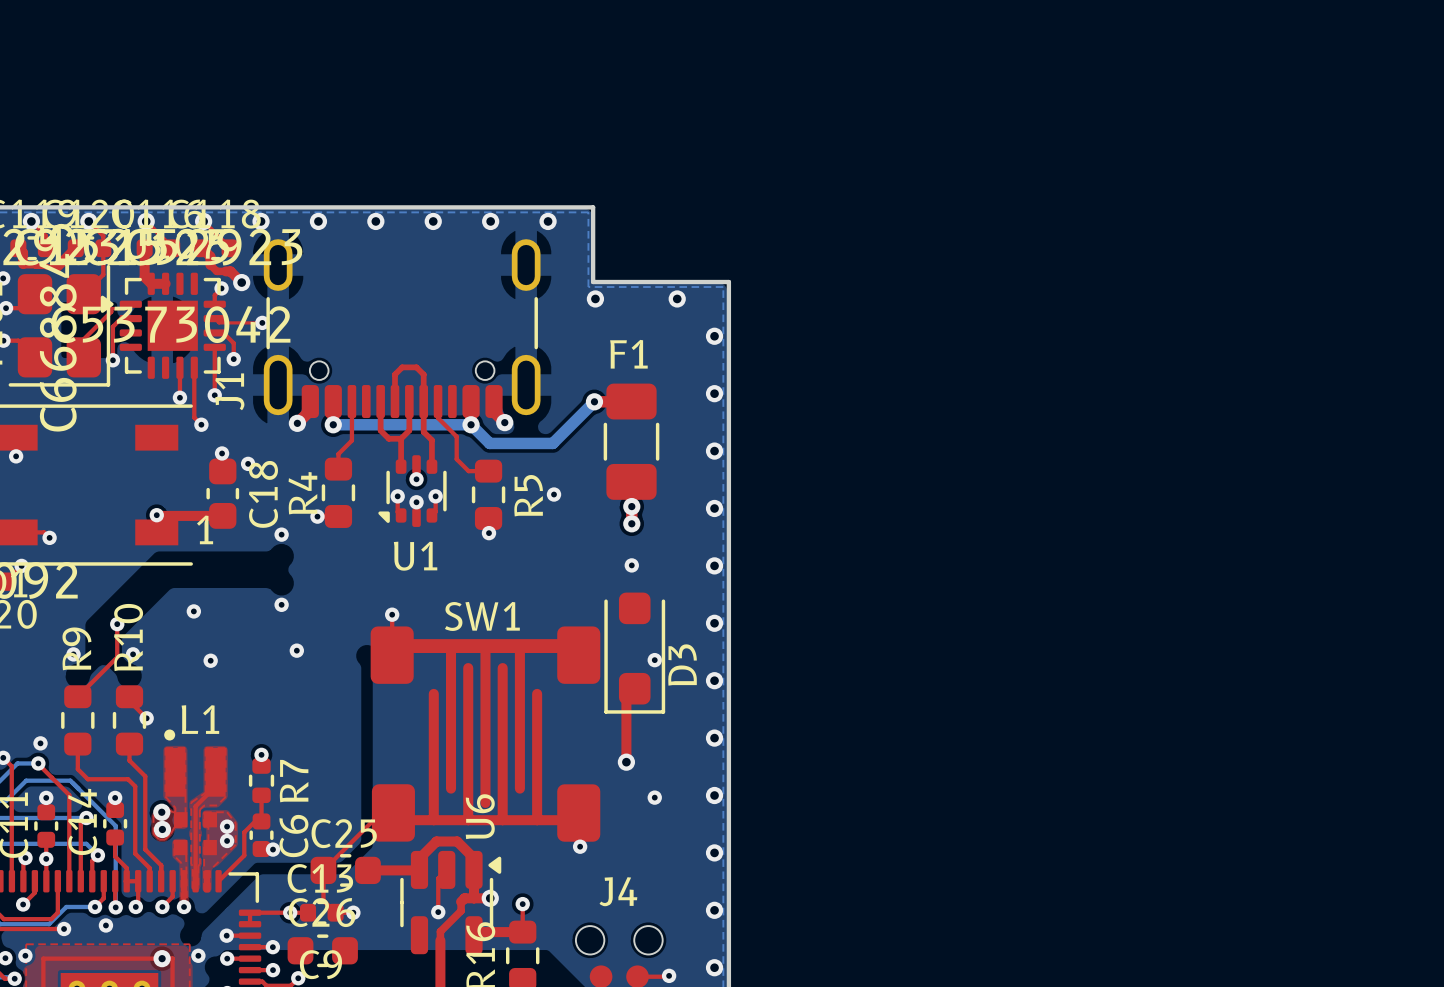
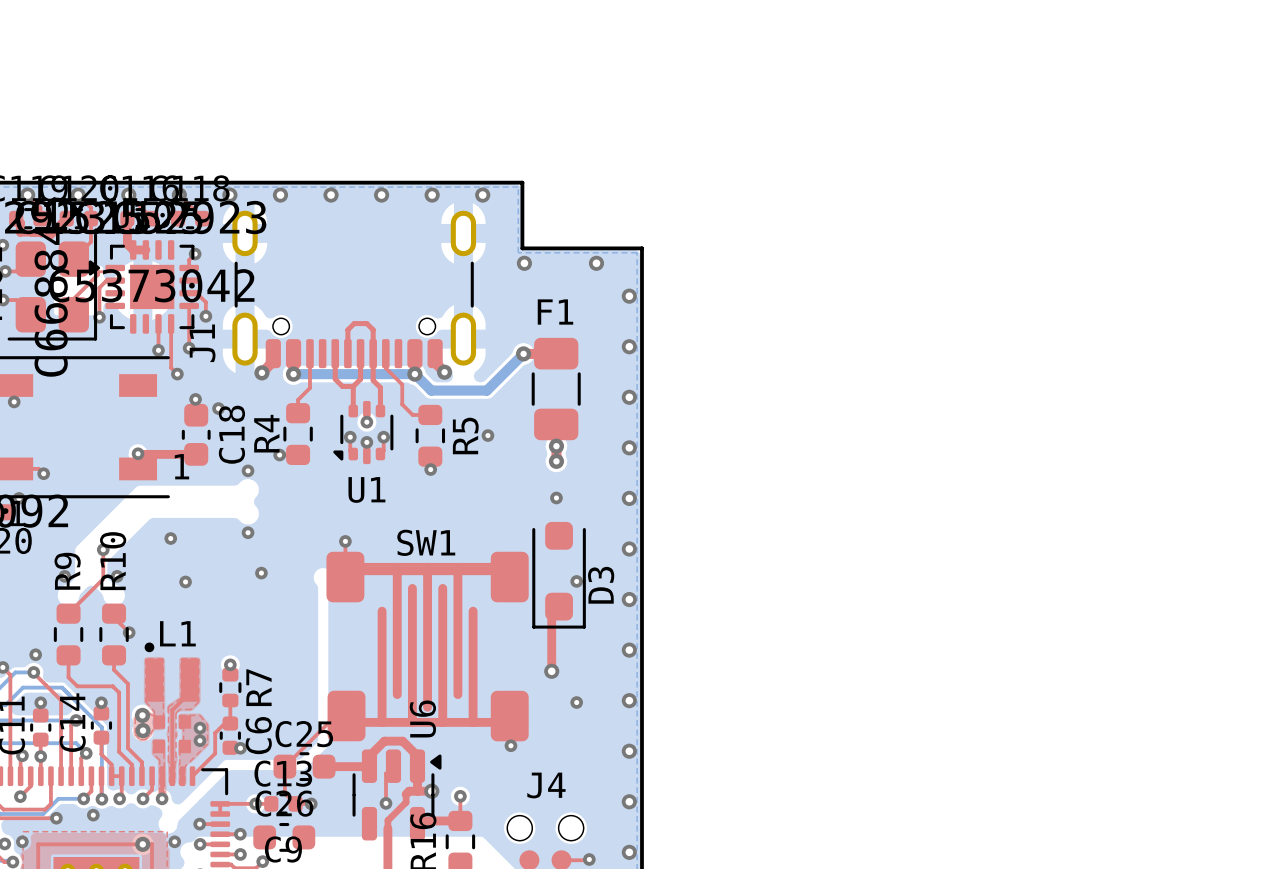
top track: (202, 248) (210, 256) (210, 264) (216, 271) (230, 271) (241, 282) -> none
via: (241, 282) -> none
top track: (214, 318) (219, 322) (262, 322) -> none
via: (262, 322) -> none

